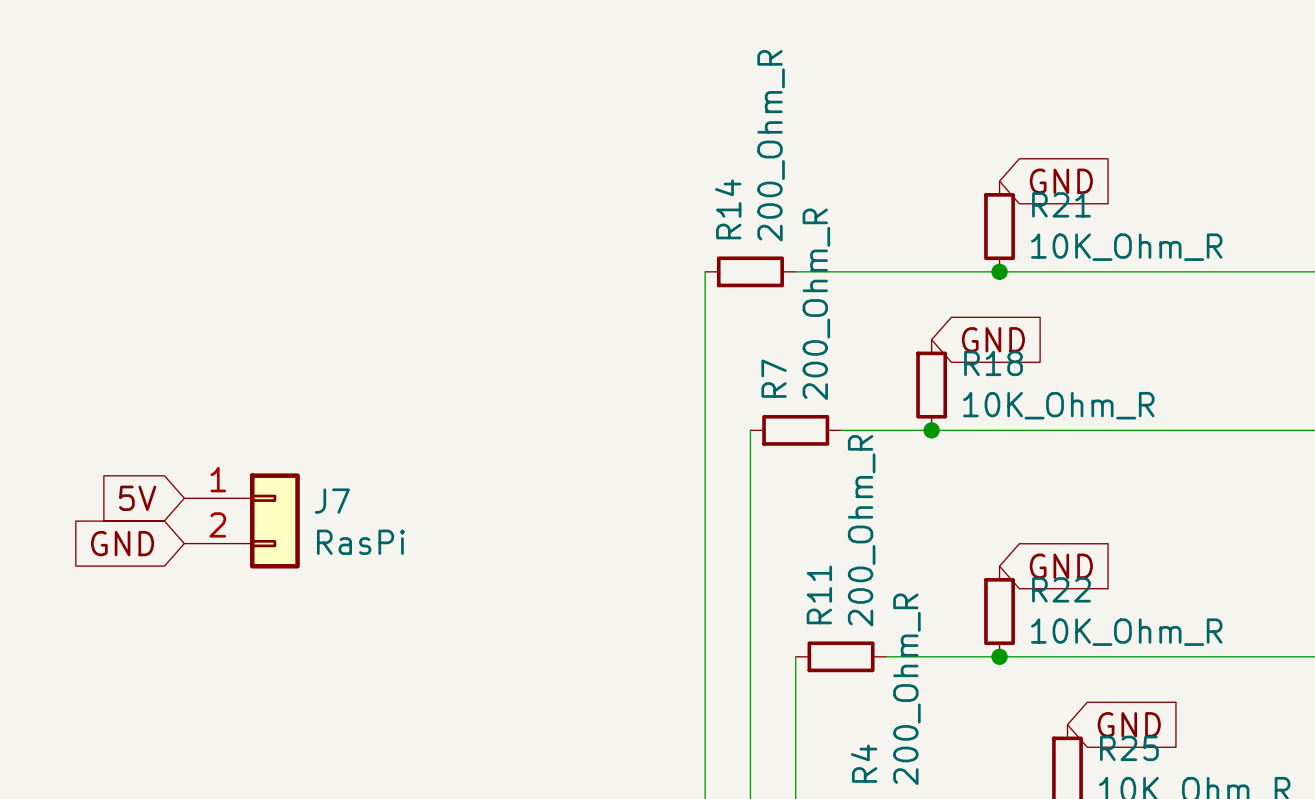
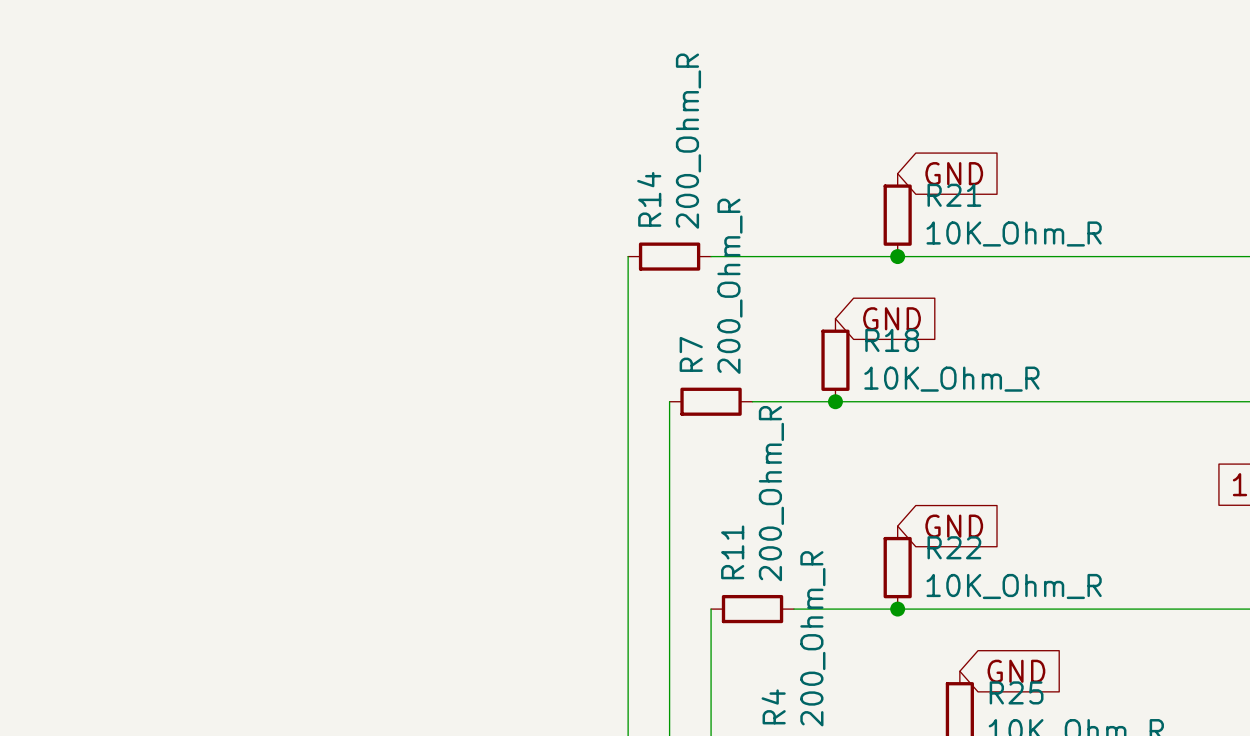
global label: 5V (137, 498) -> none
J7: RasPi (242, 520) -> none
global label: GND (122, 543) -> none

